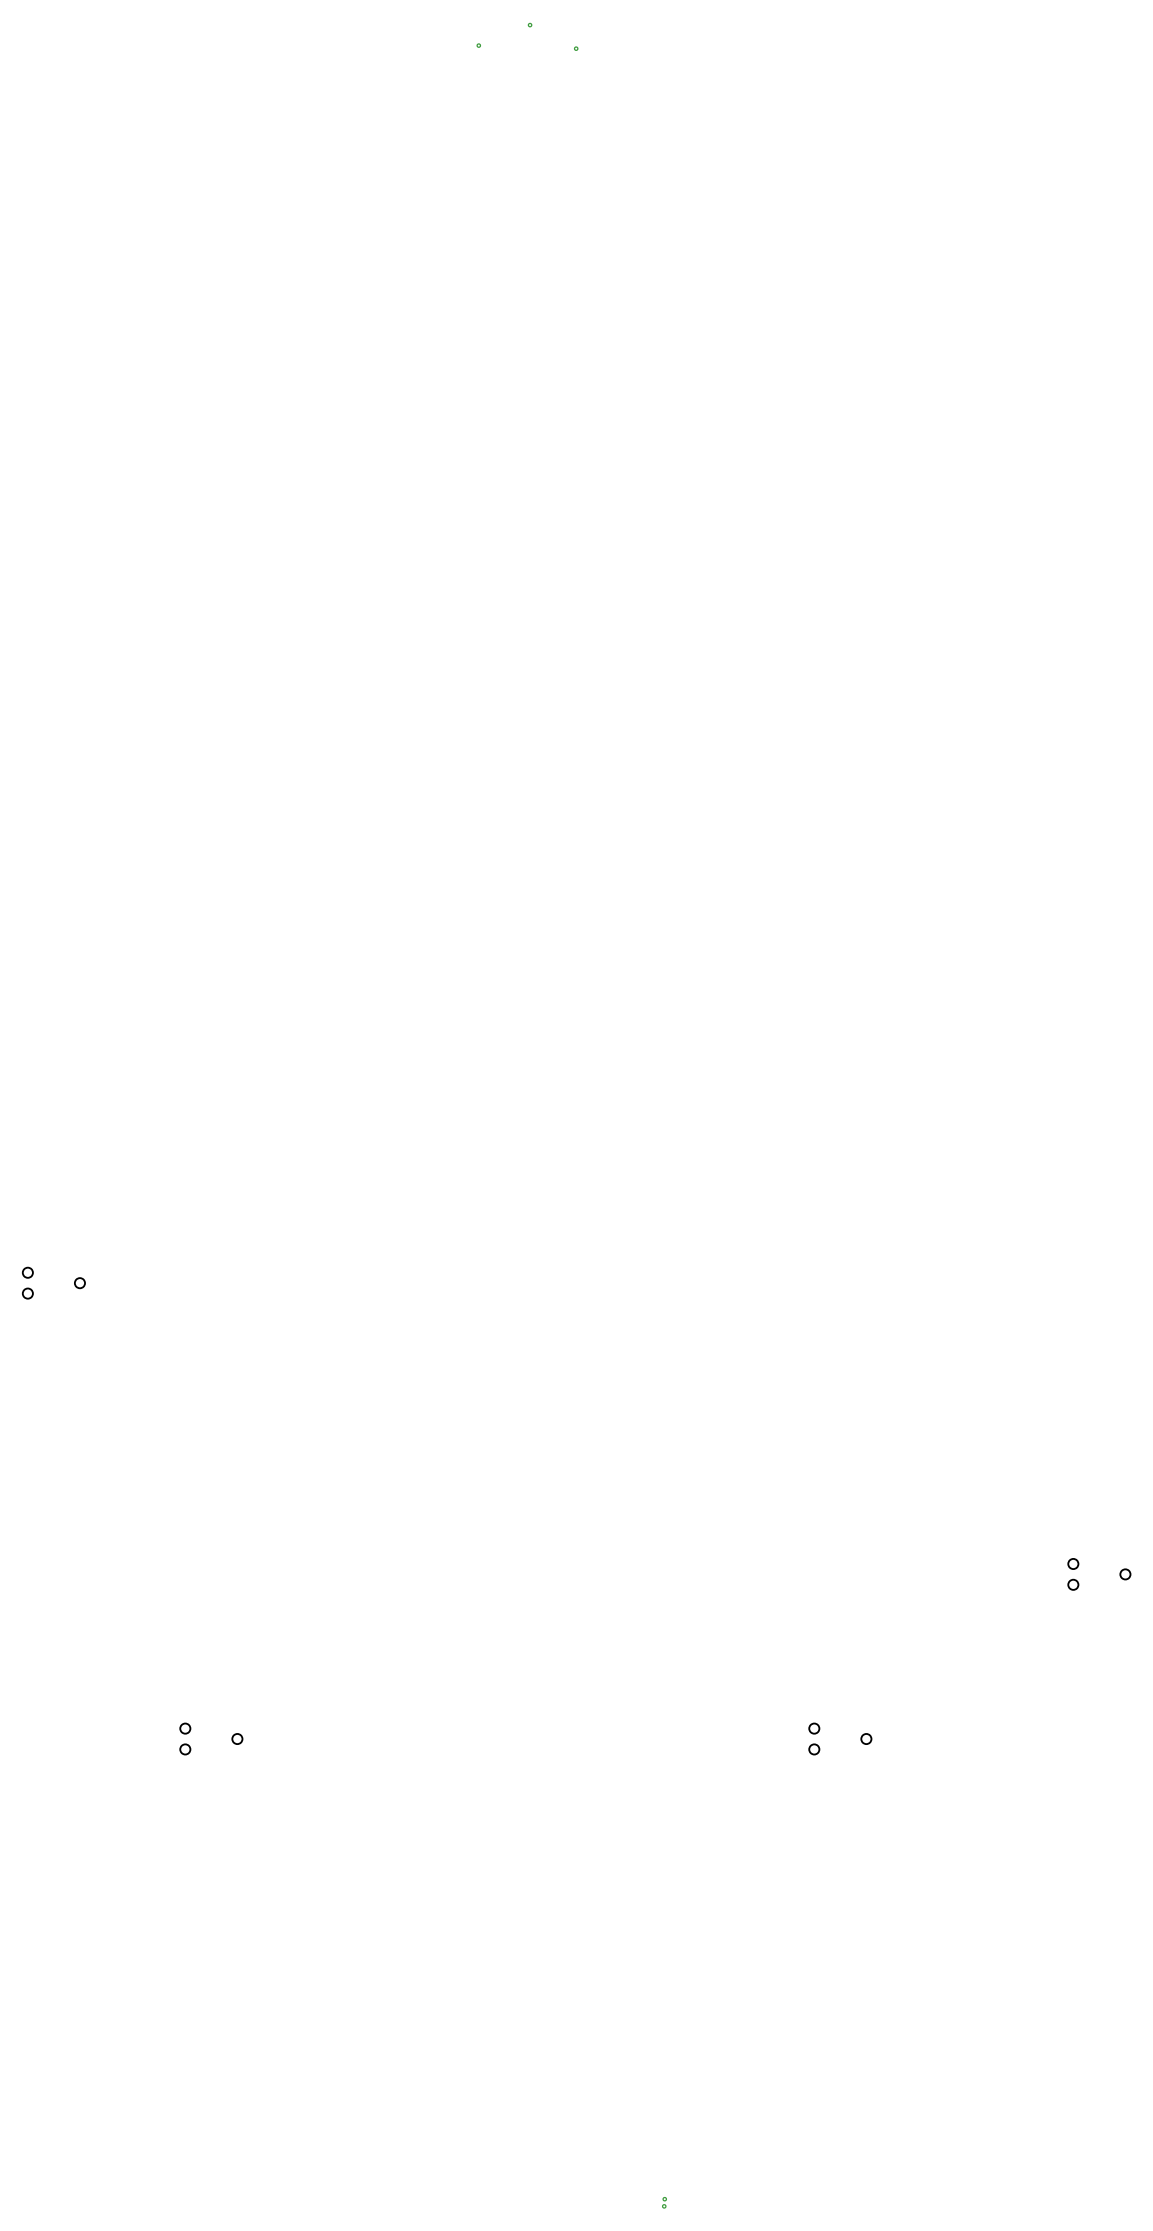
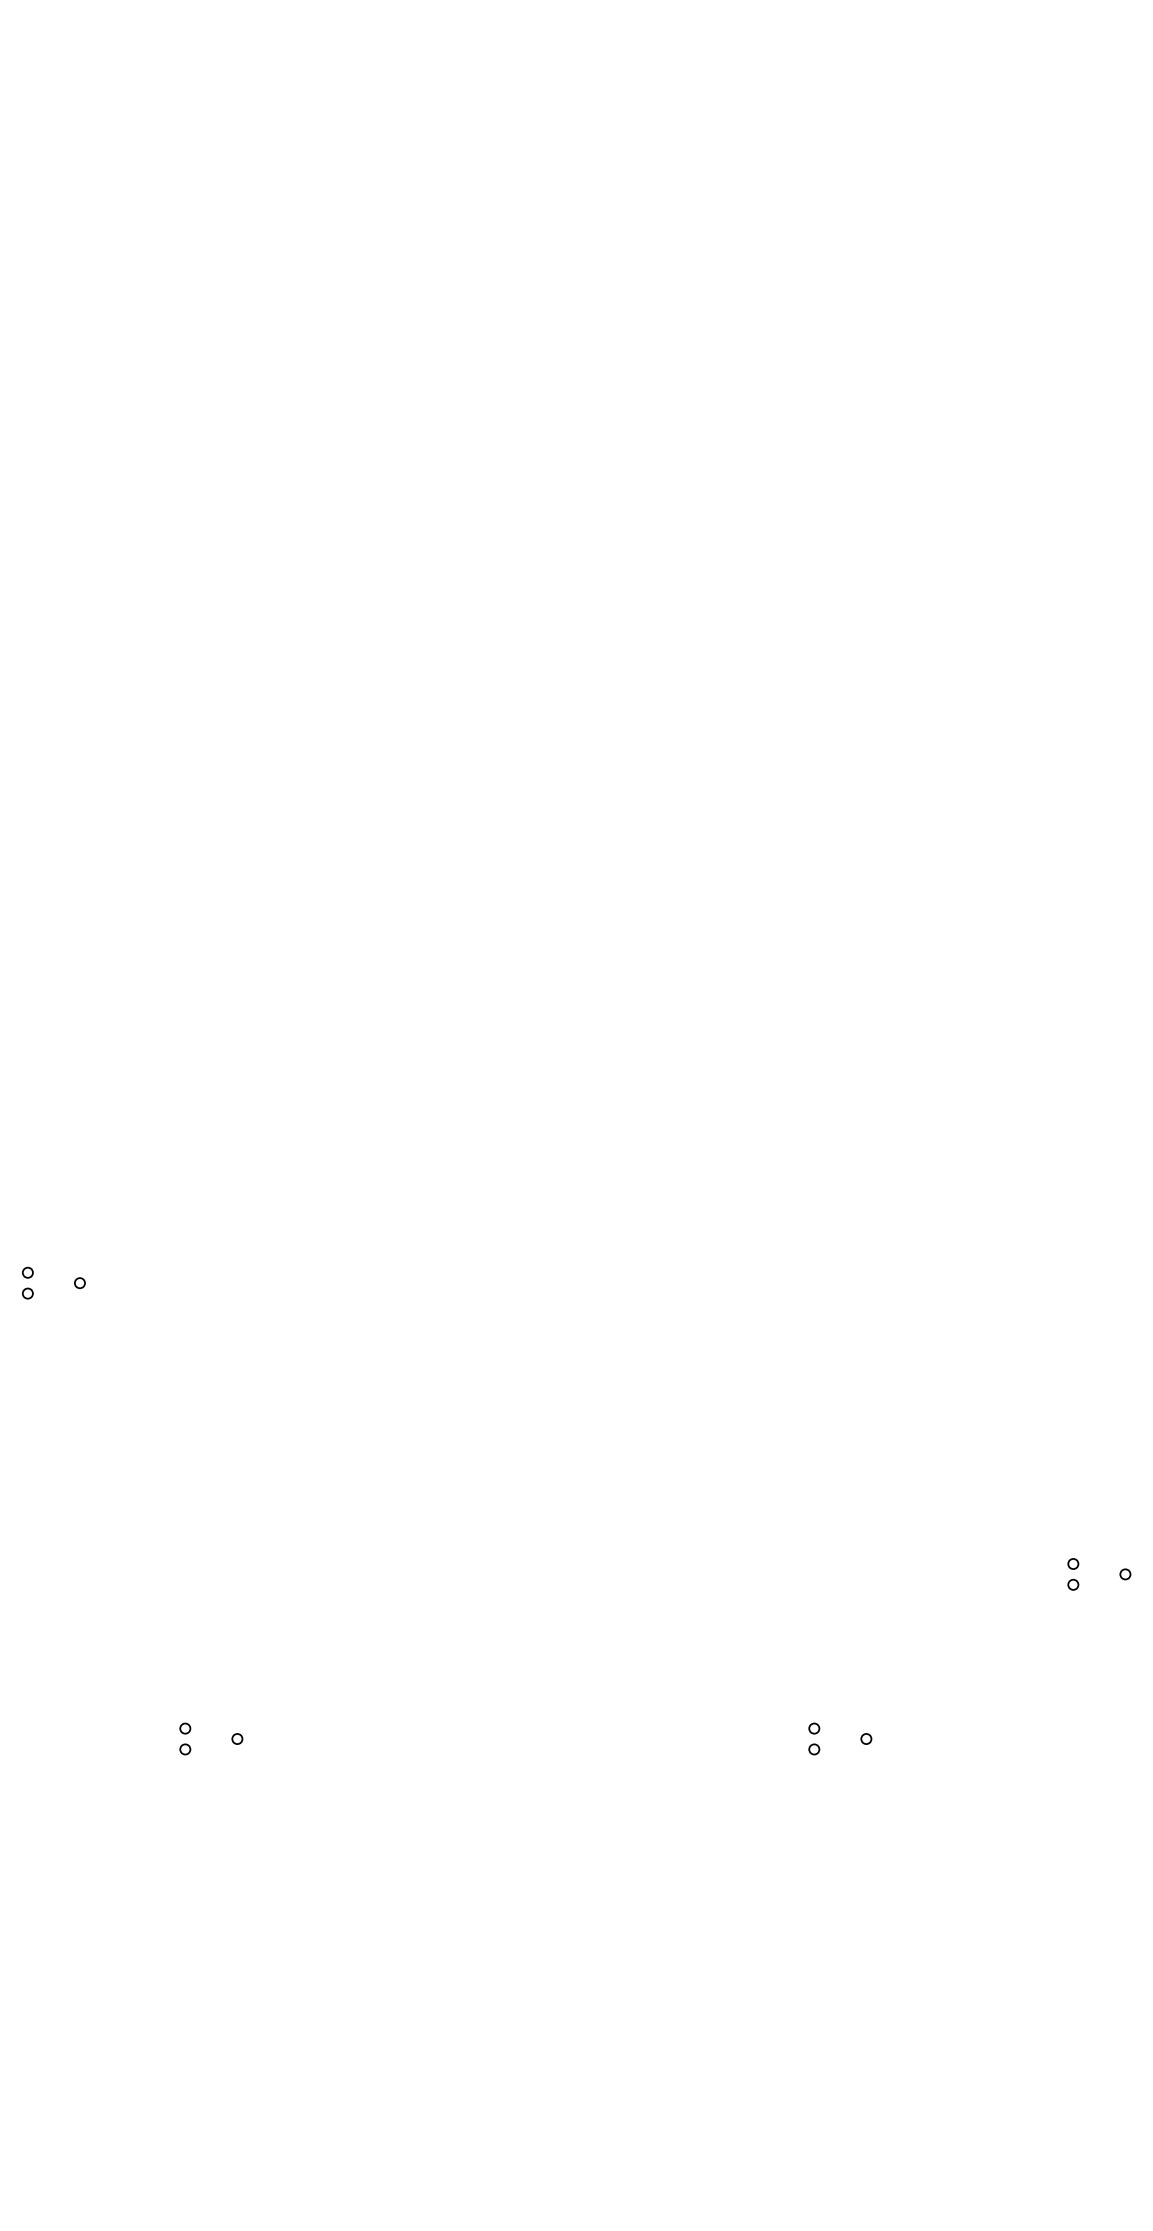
via: (530, 25) -> none
via: (478, 45) -> none
via: (576, 48) -> none
via: (664, 2199) -> none
via: (664, 2206) -> none

